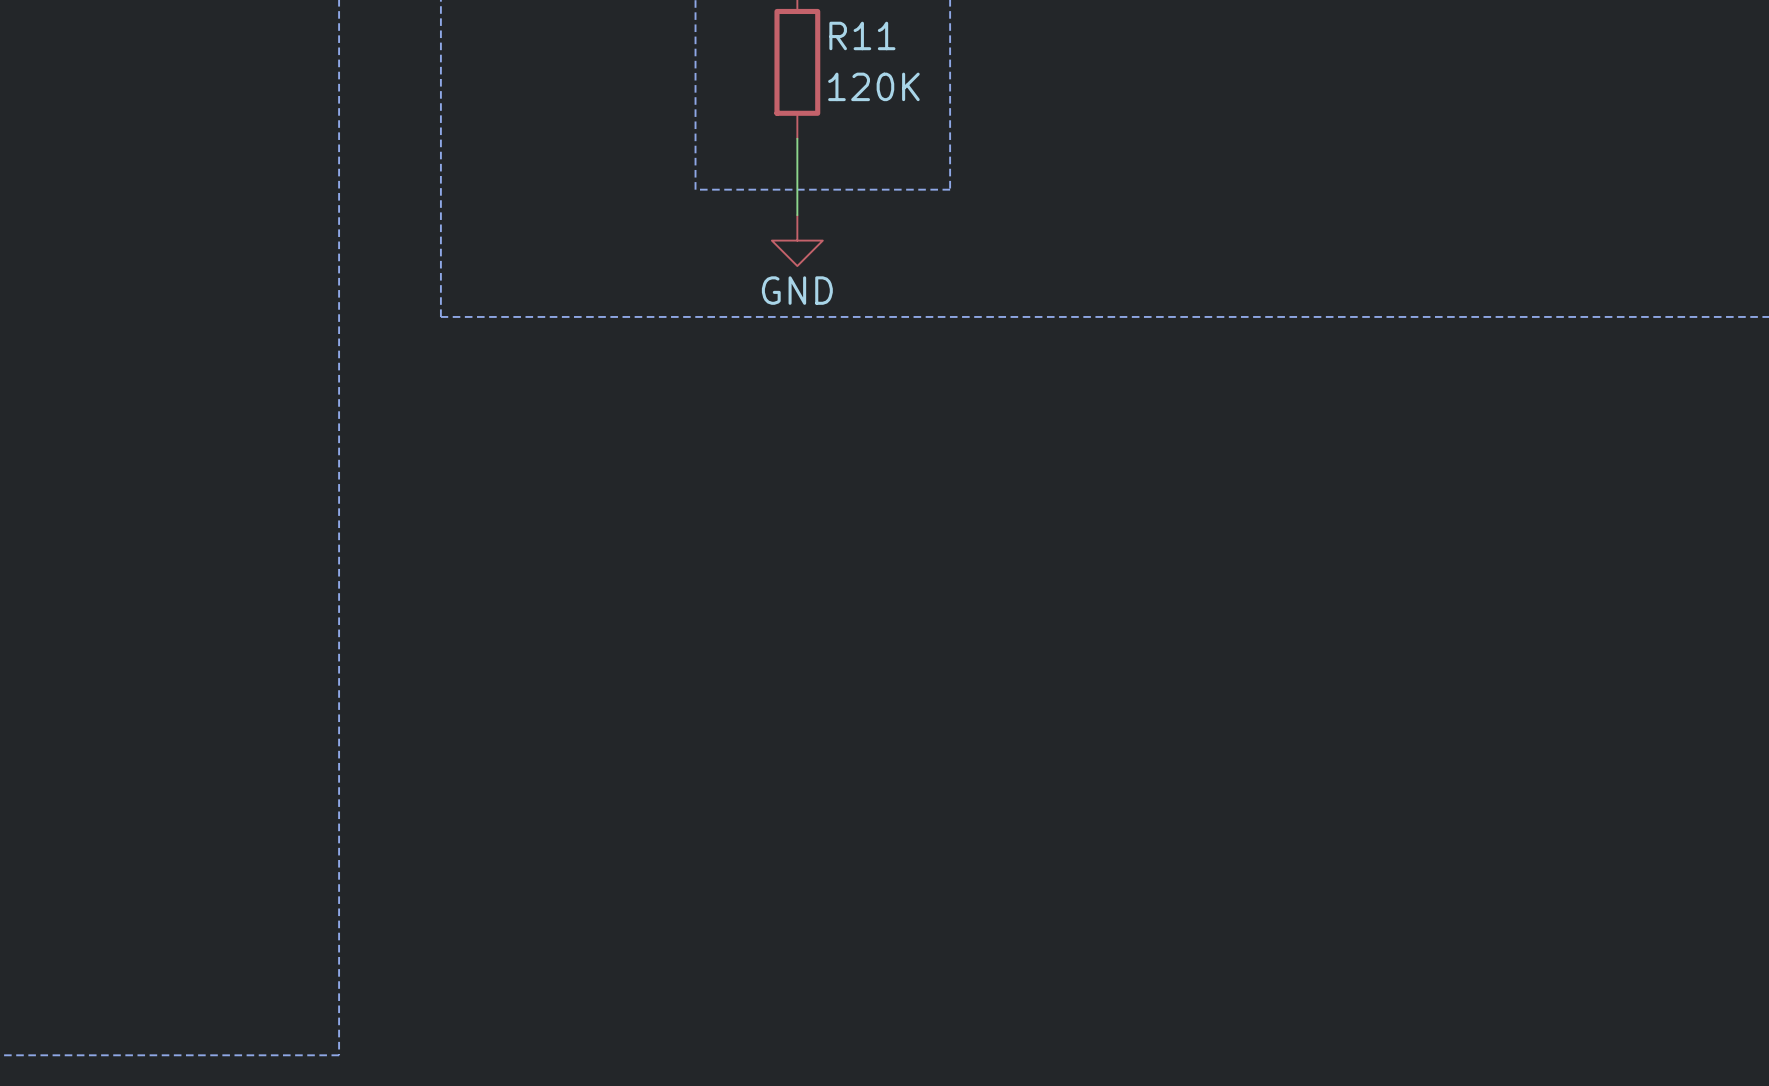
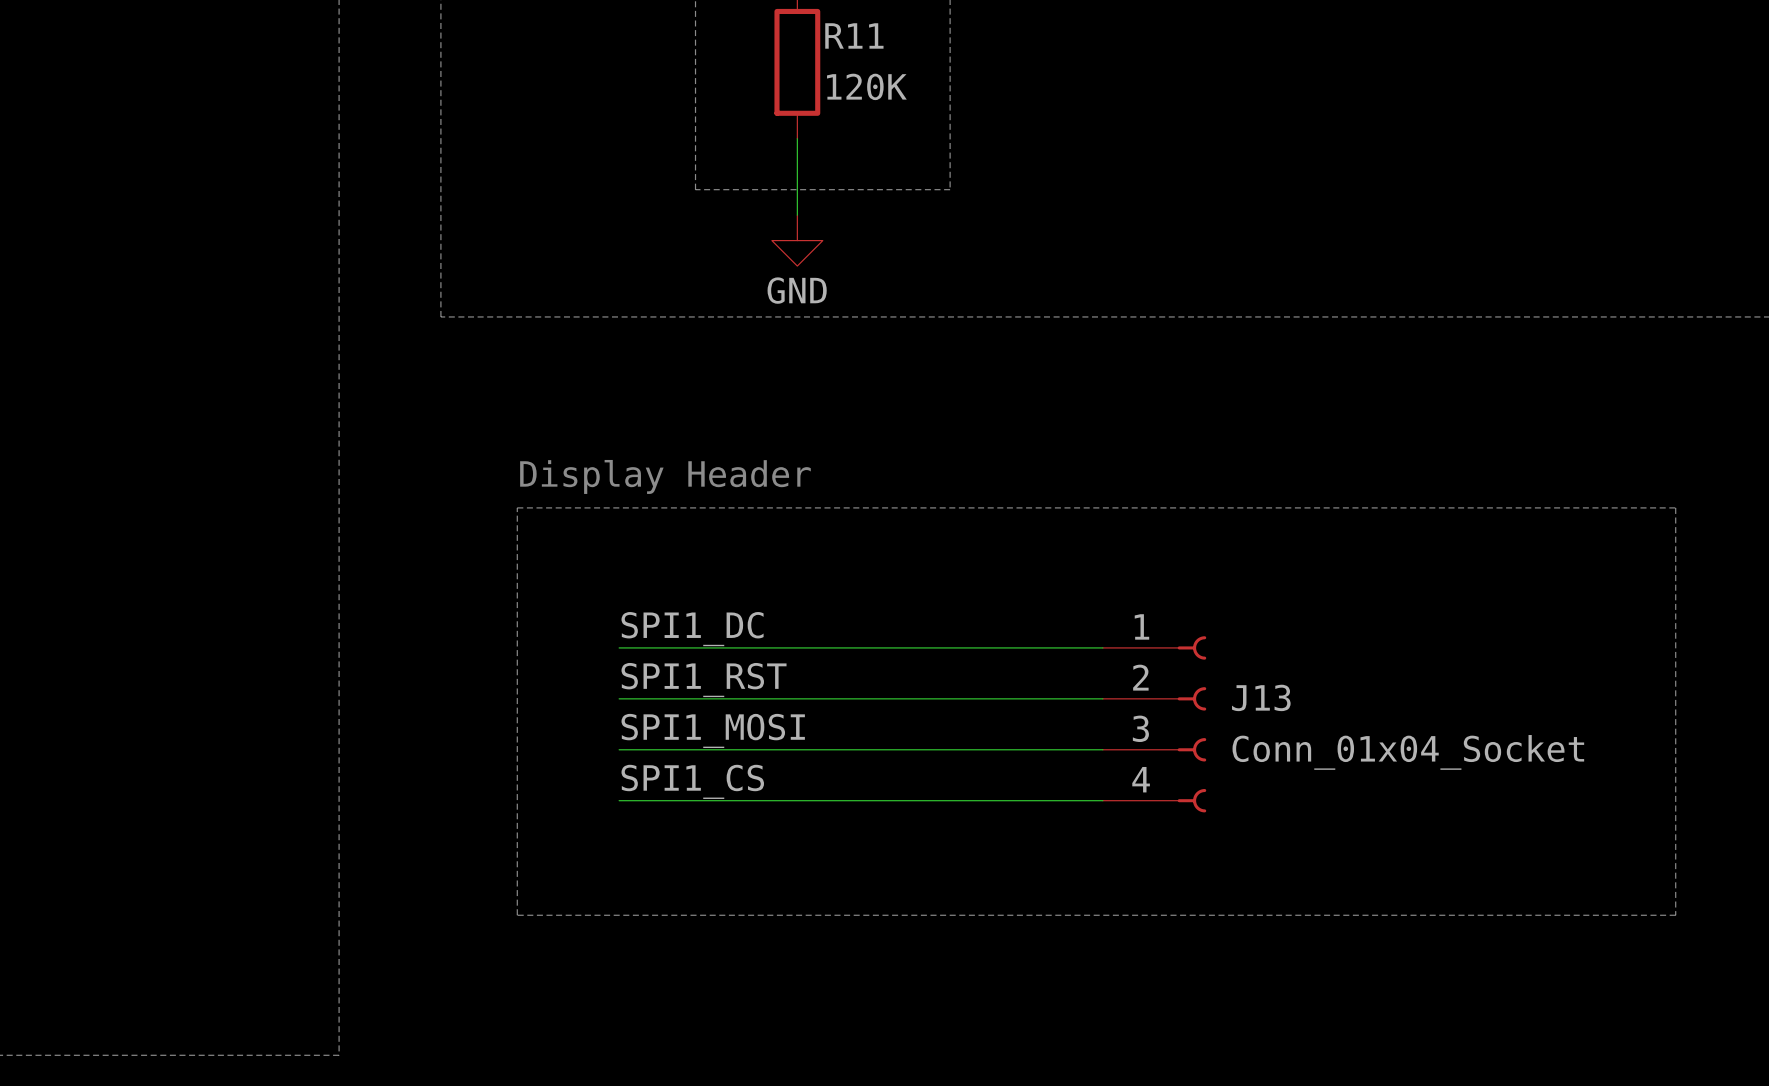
text: none -> Display Header (665, 476)
line: none -> (517, 507) (1675, 507) (1675, 915) (517, 915) (517, 507)
label: none -> SPI1_DC (692, 629)
wire: none -> (619, 647) (1102, 647)
label: none -> SPI1_RST (704, 680)
wire: none -> (619, 698) (1102, 698)
J13: none -> Conn_01x04_Socket (1154, 724)
label: none -> SPI1_MOSI (713, 730)
wire: none -> (619, 749) (1102, 749)
label: none -> SPI1_CS (692, 781)
wire: none -> (619, 800) (1102, 800)

